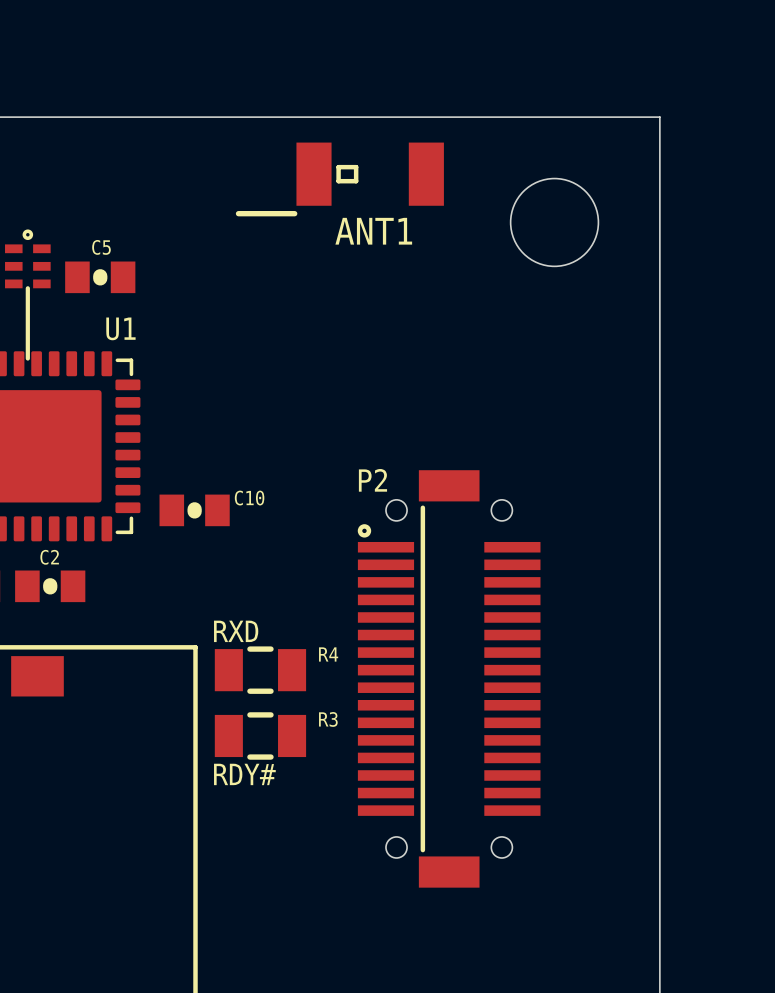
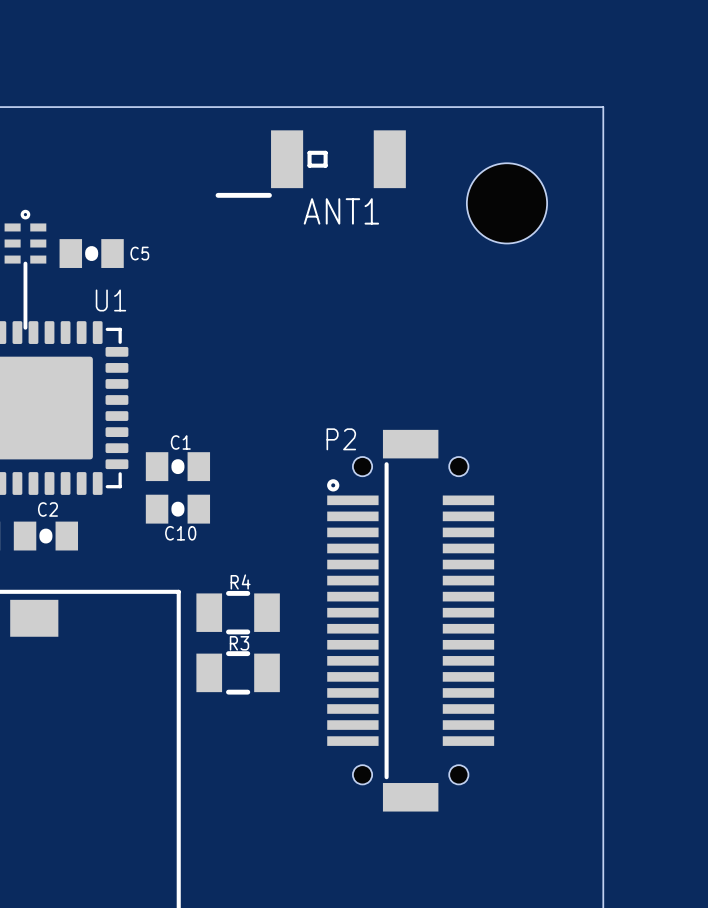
C5 name position: C5 (101, 247) -> C5 (139, 253)
C10 name: C10 (249, 498) -> C1 (180, 442)
C10: none -> (177, 509)
text: RXD (236, 631) -> none
R4 name position: R4 (328, 654) -> R4 (240, 581)
R3 name position: R3 (328, 719) -> R3 (239, 643)
text: RDY# (244, 774) -> none

